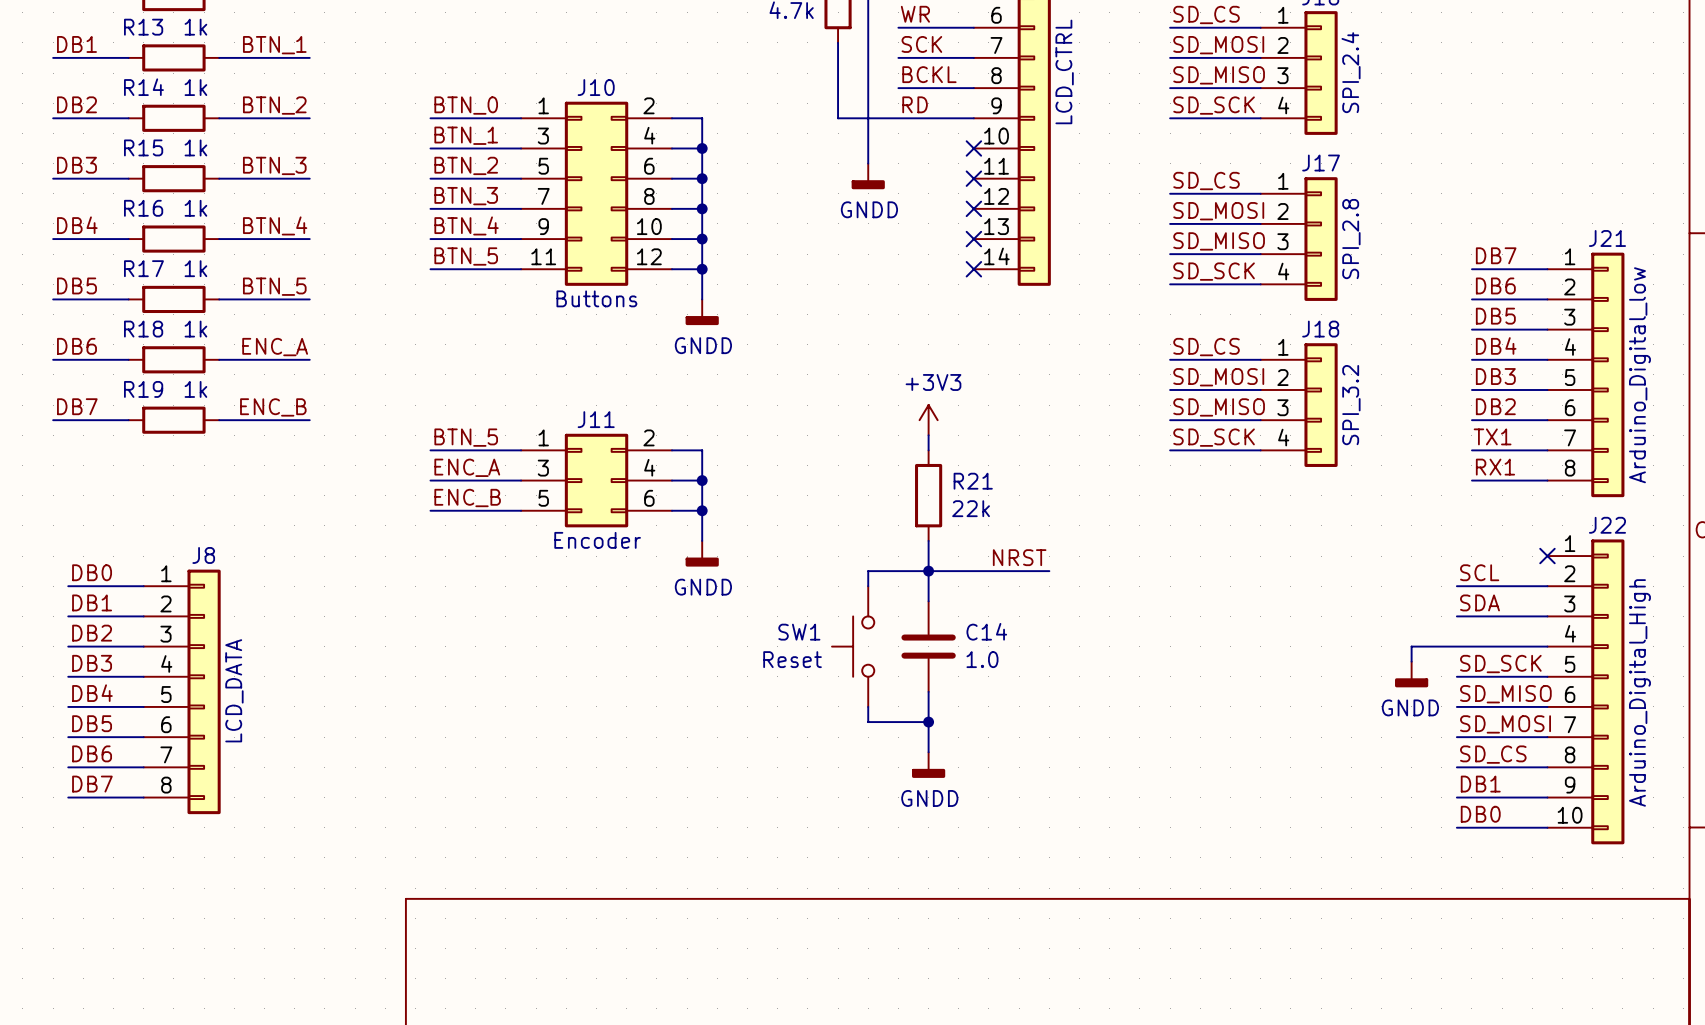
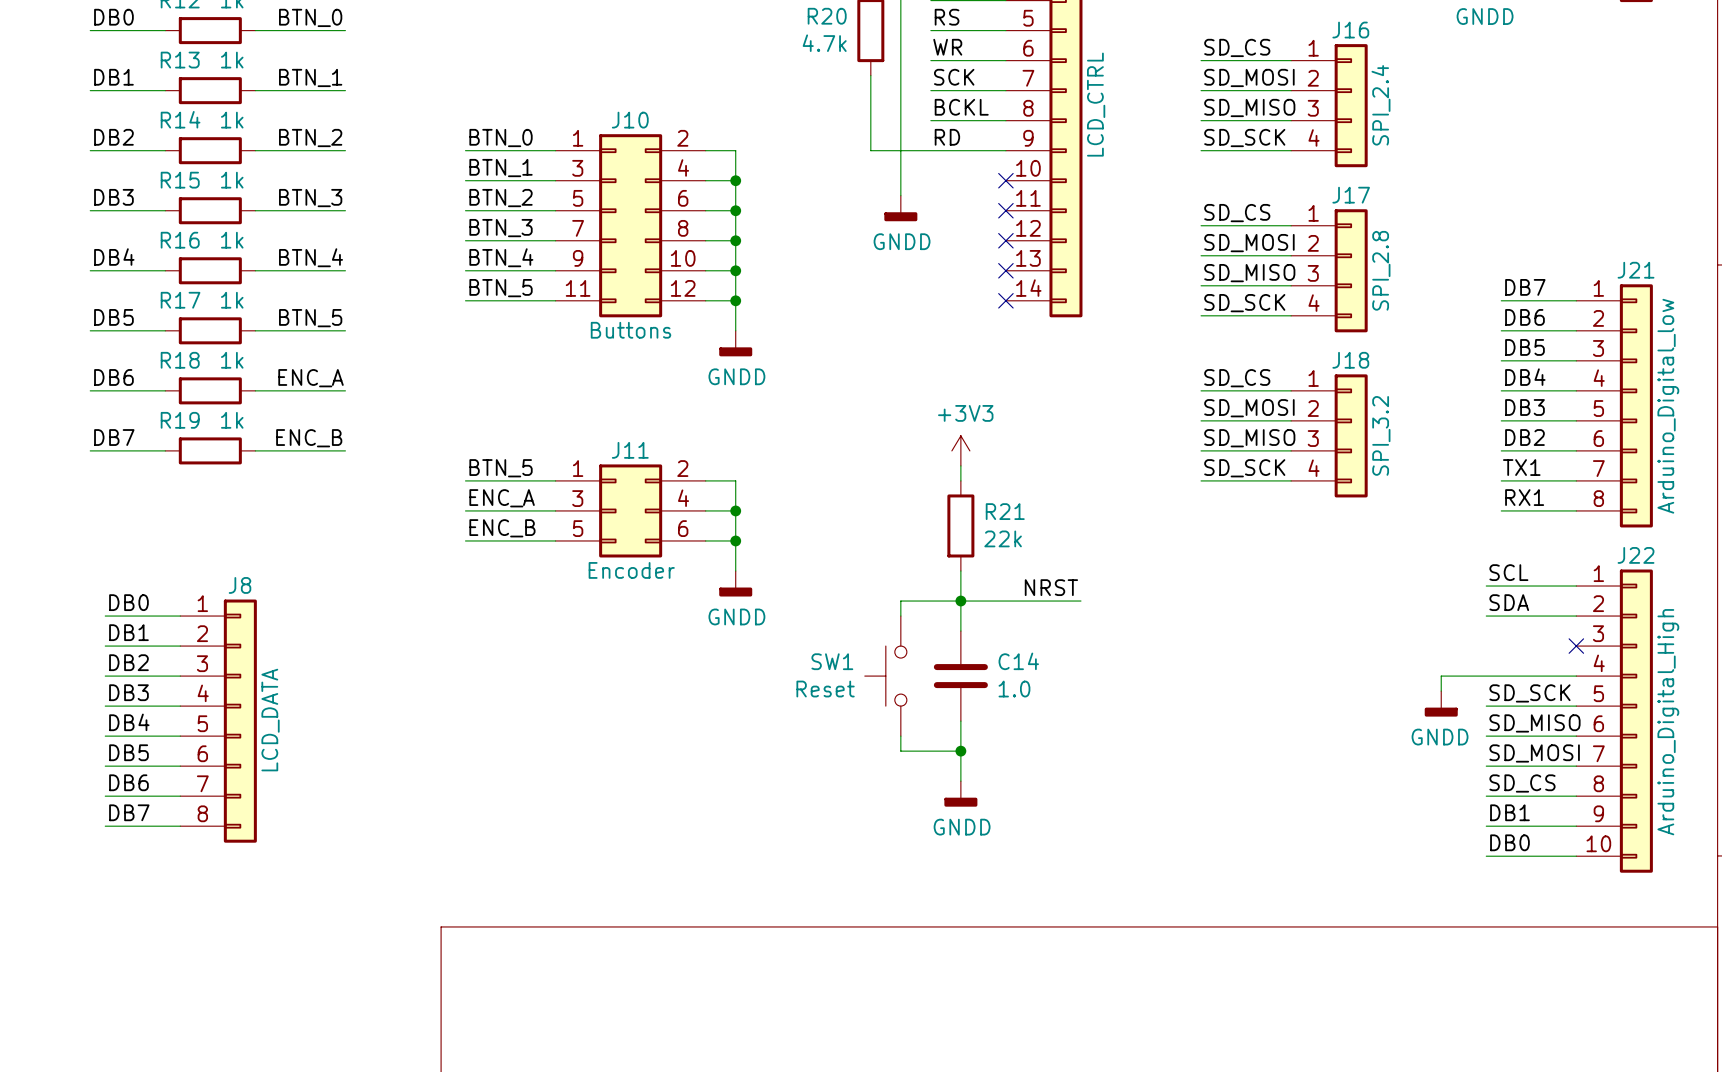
label: none -> SCL (1508, 572)
no-connect mark position: (1547, 556) -> (1576, 646)
label: SCL (1479, 572) -> SDA (1509, 602)
label: SDA (1480, 602) -> none
wire: (1456, 616) (1547, 616) -> (1486, 586) (1576, 586)

